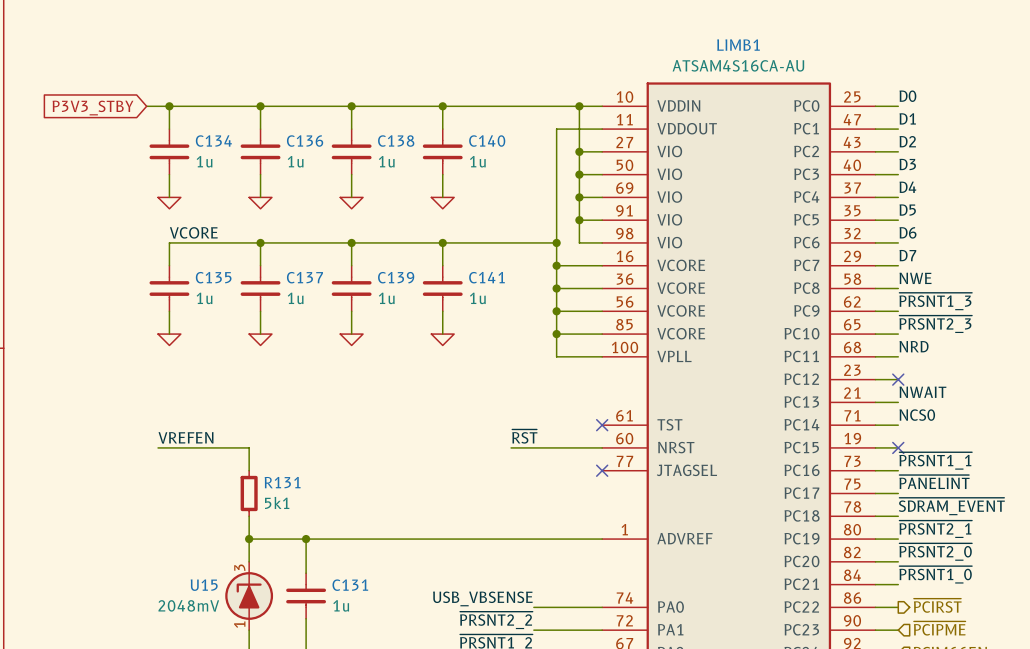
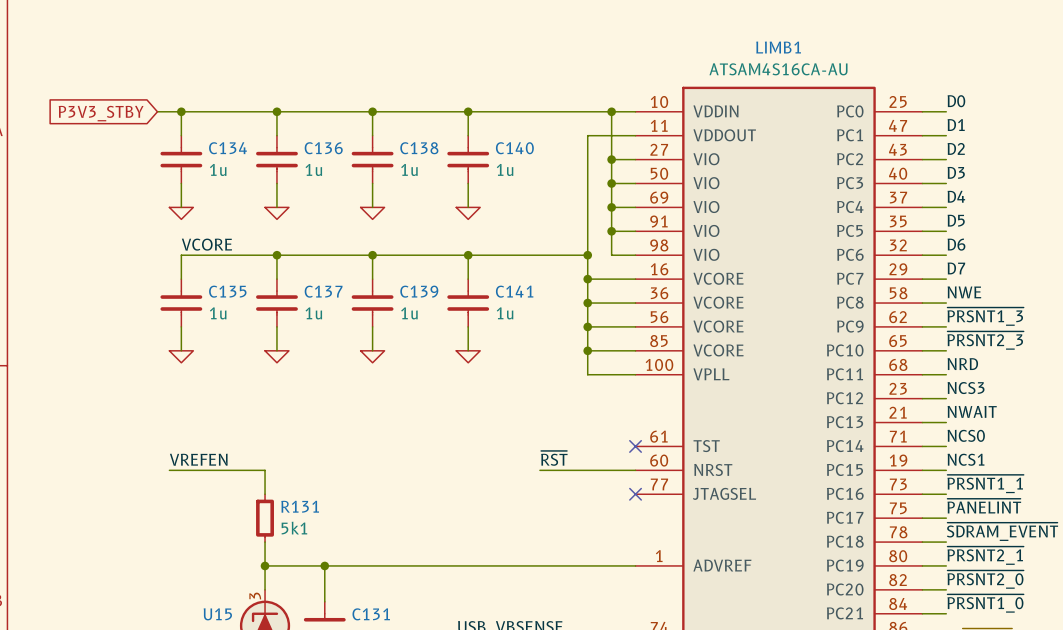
label: none -> NCS3 (966, 388)
no-connect mark: (898, 379) -> none
label: none -> NCS1 (966, 459)
no-connect mark: (898, 447) -> none

